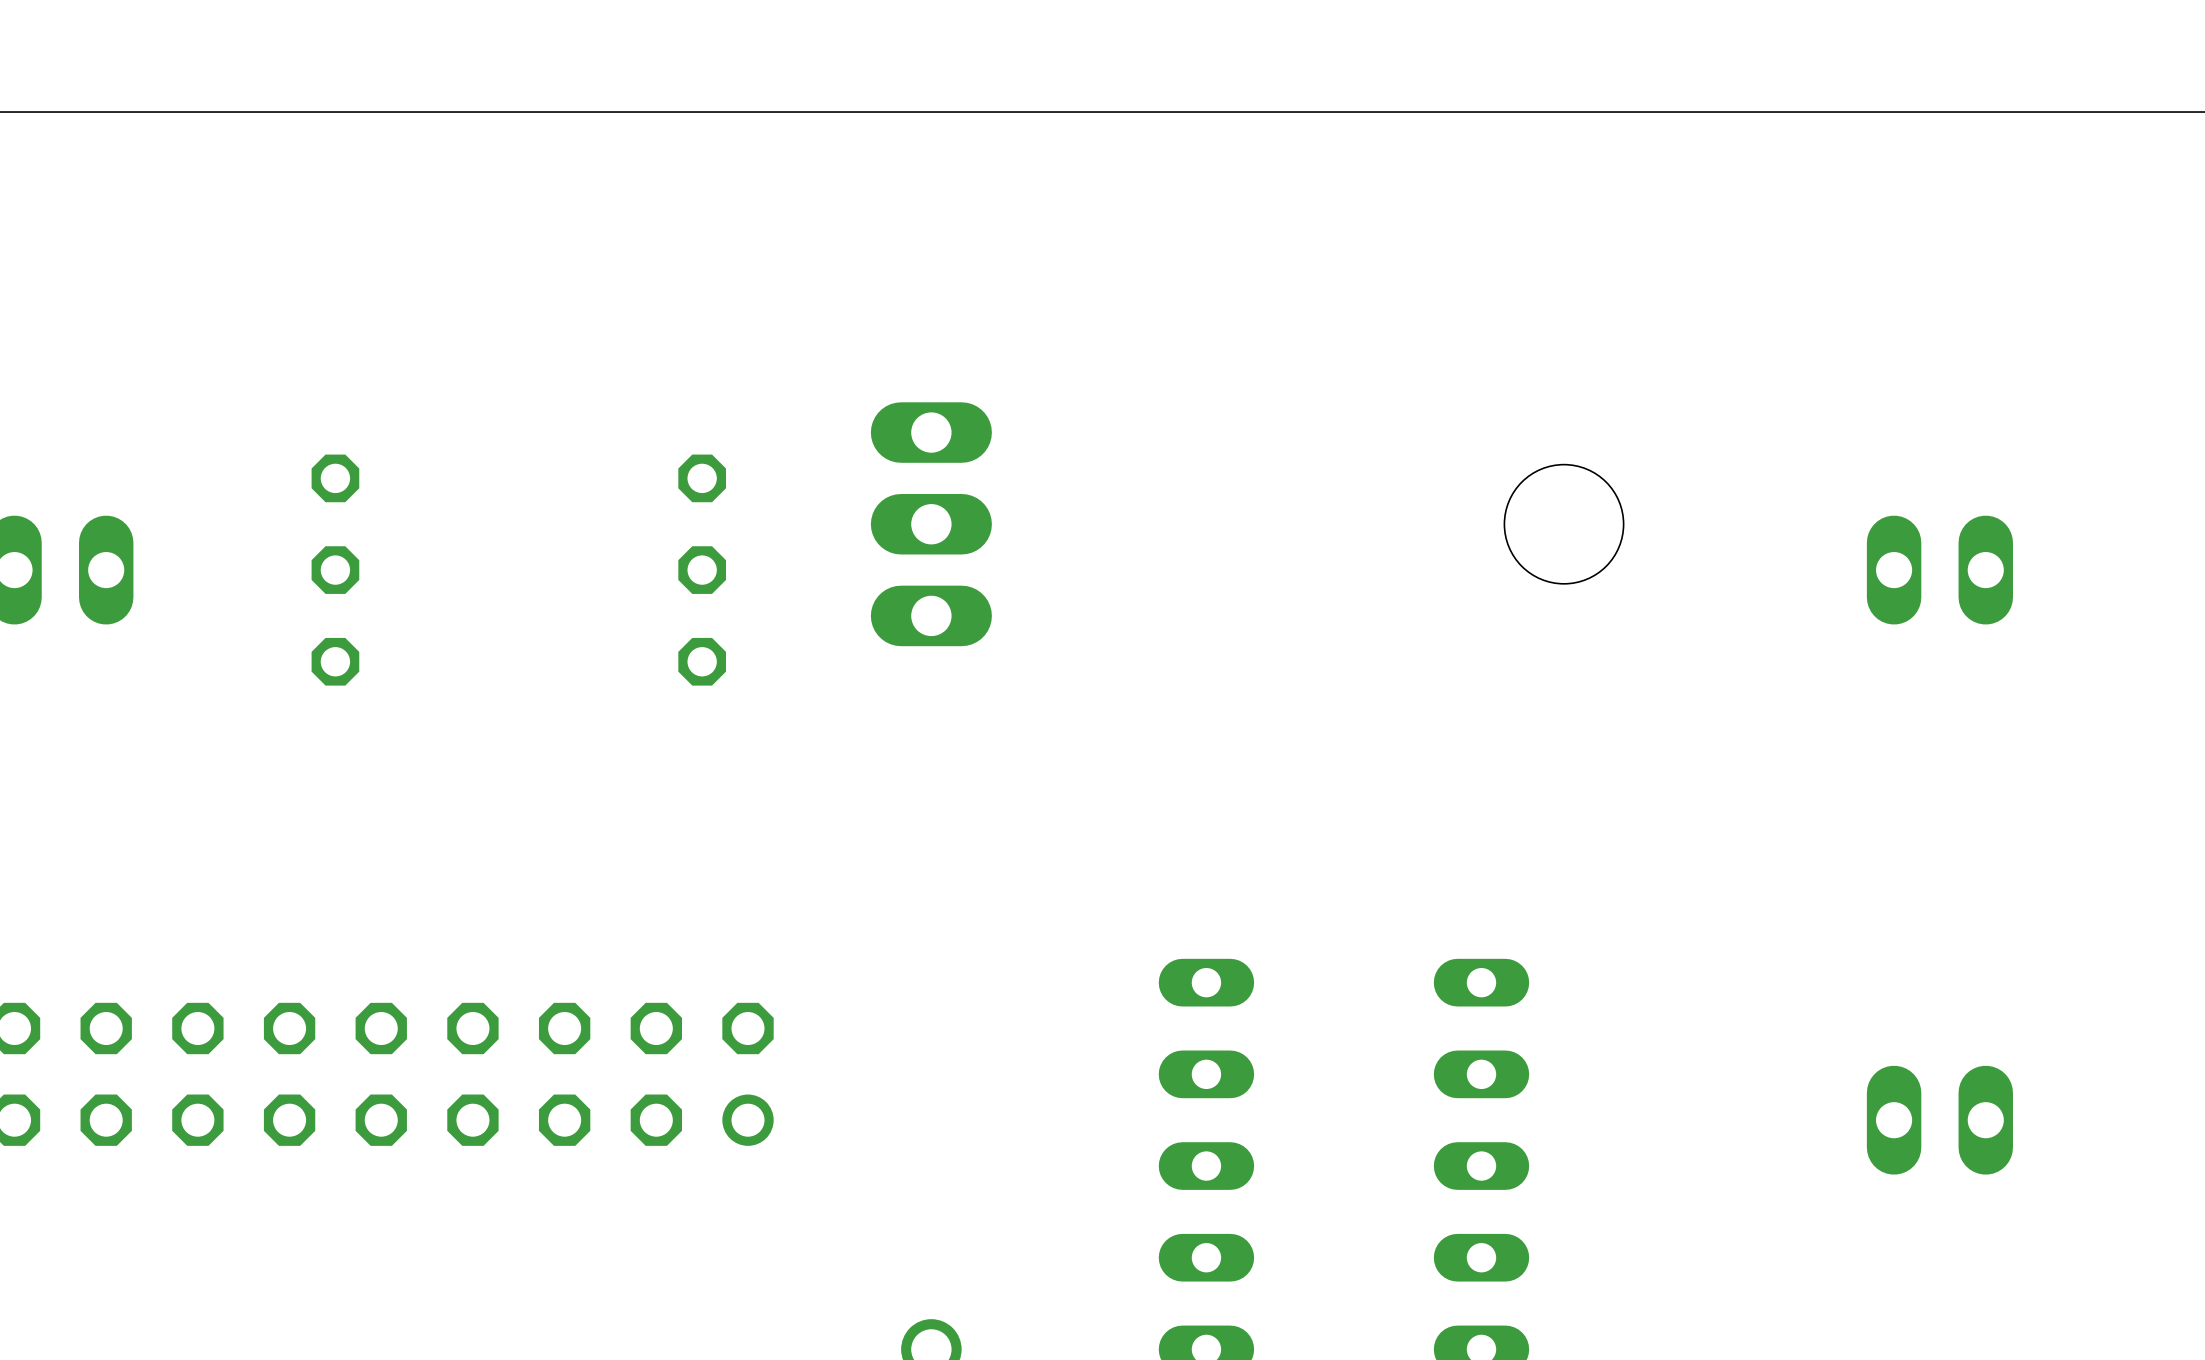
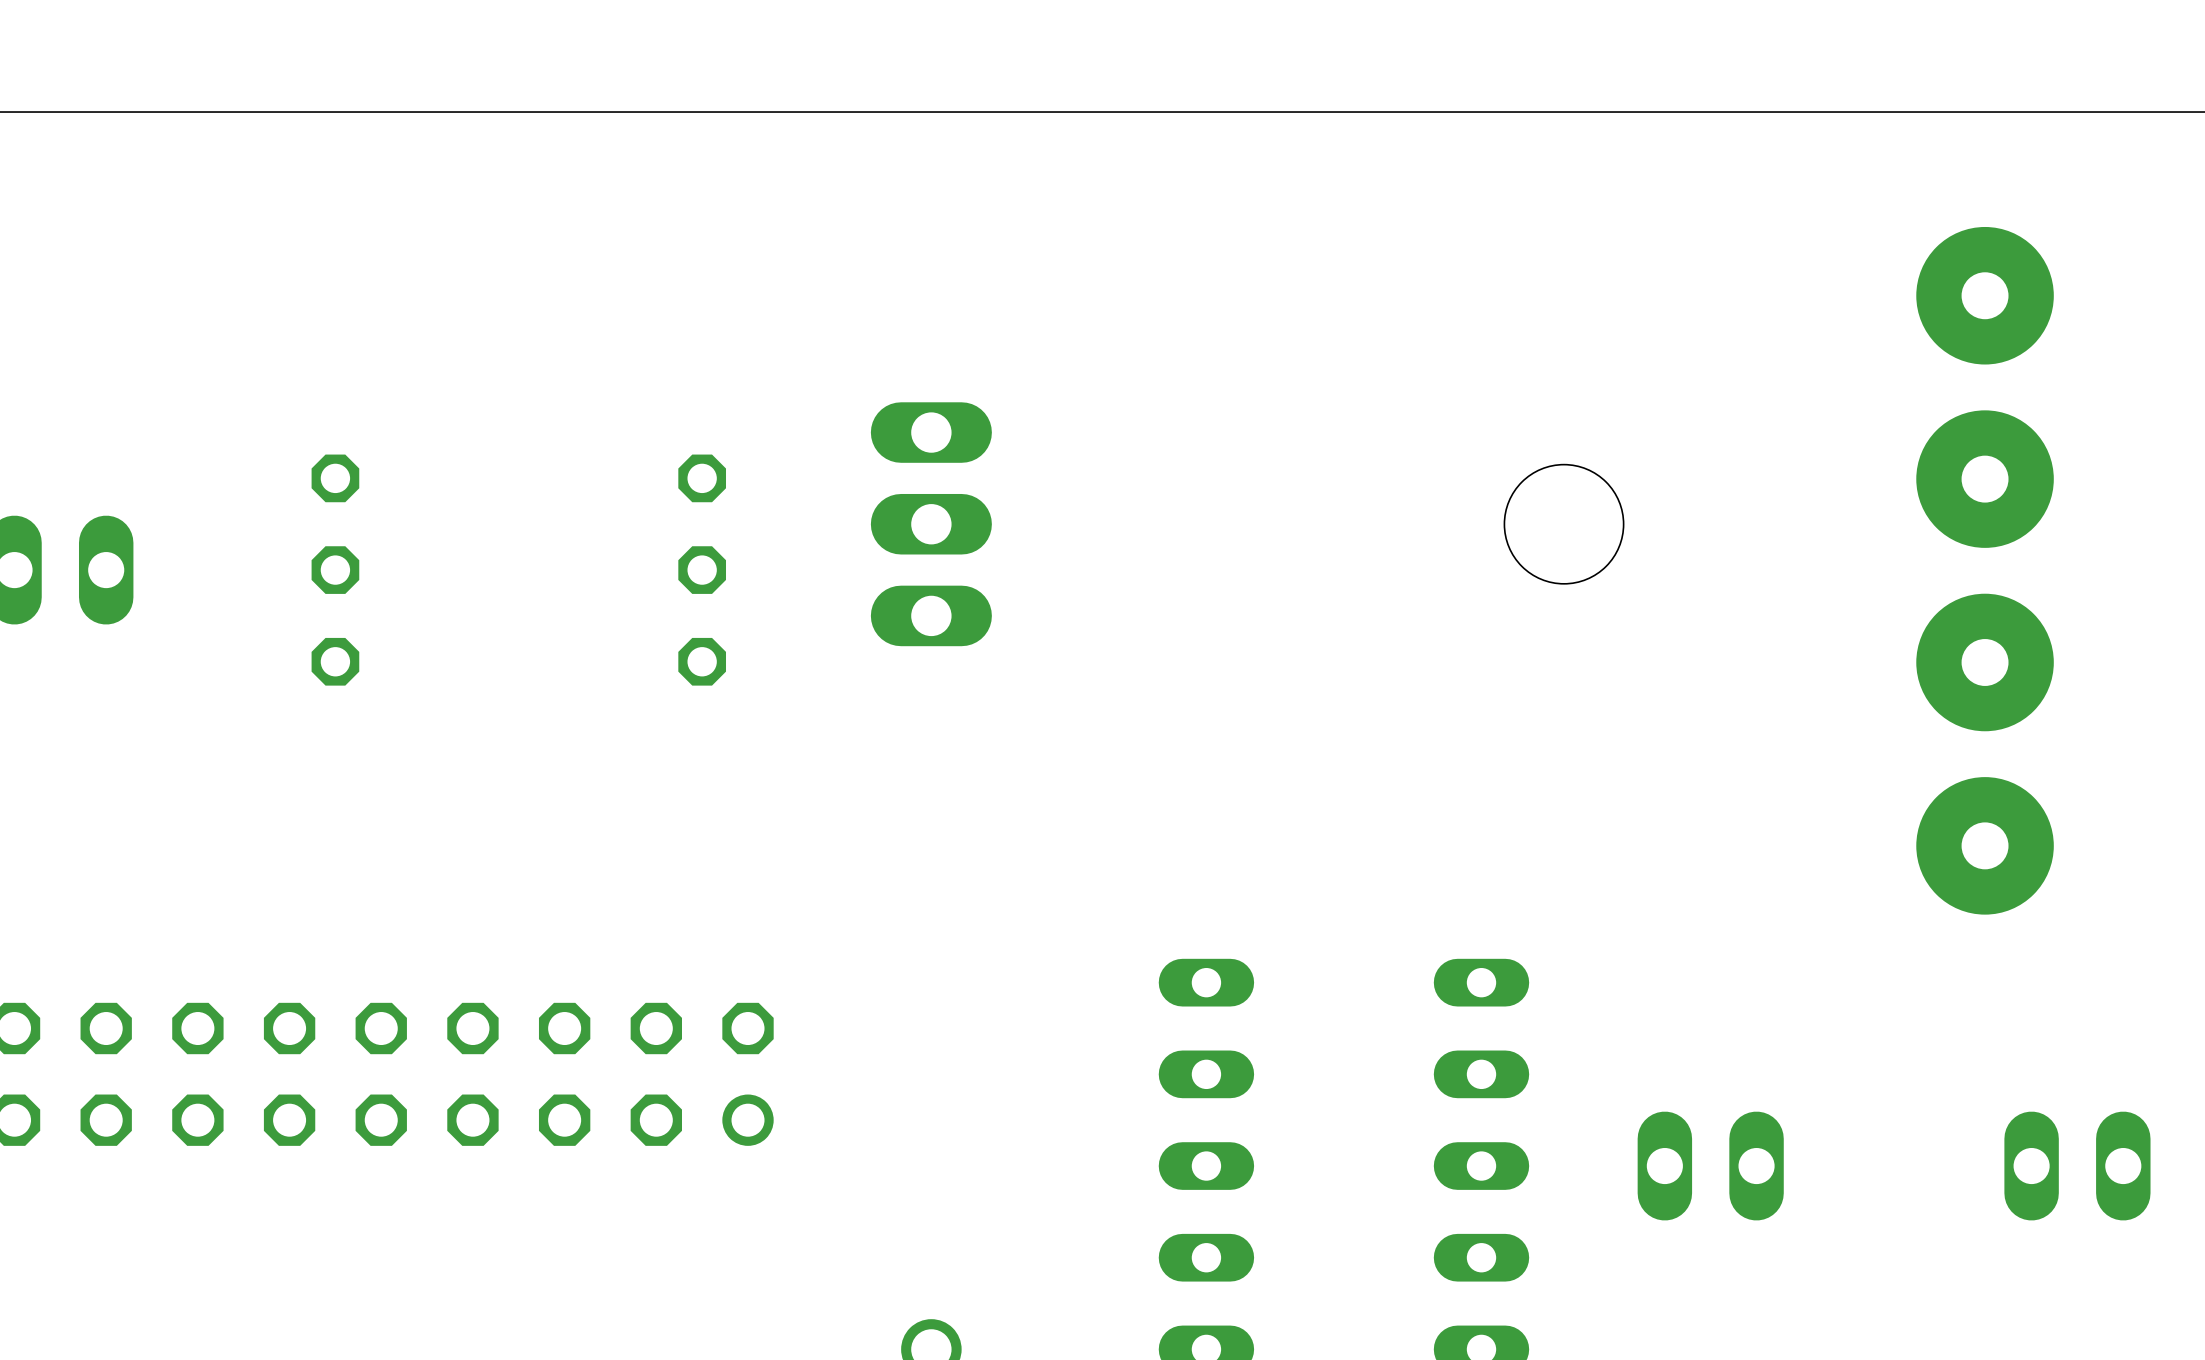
part: (1939, 570) -> none
part: none -> (1985, 570)
part: (1939, 1120) -> none
part: none -> (1710, 1166)
part: none -> (2077, 1166)

